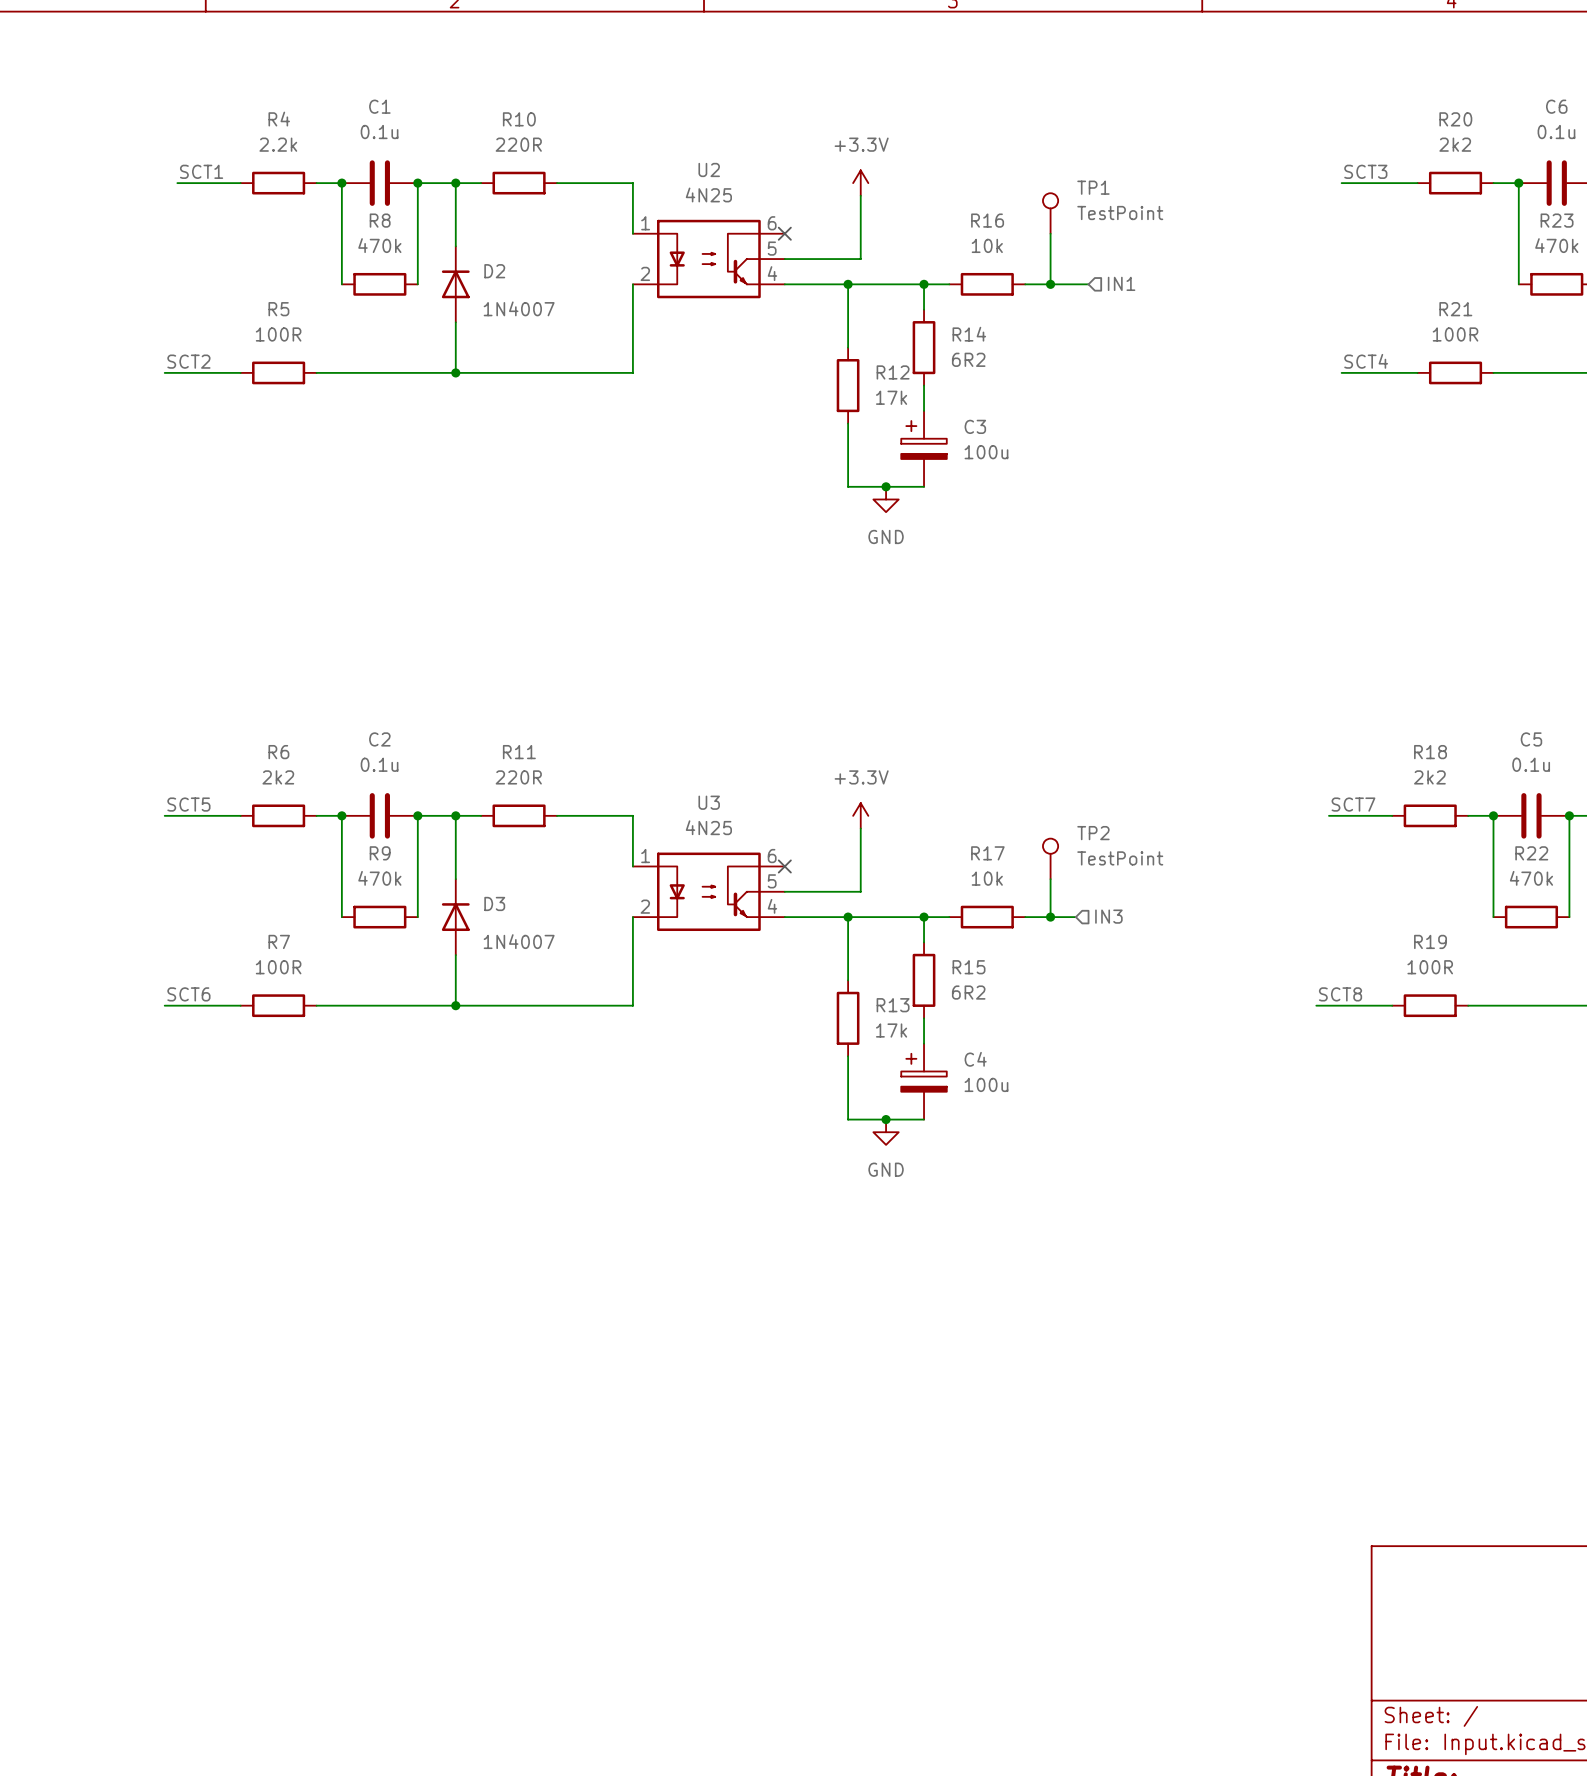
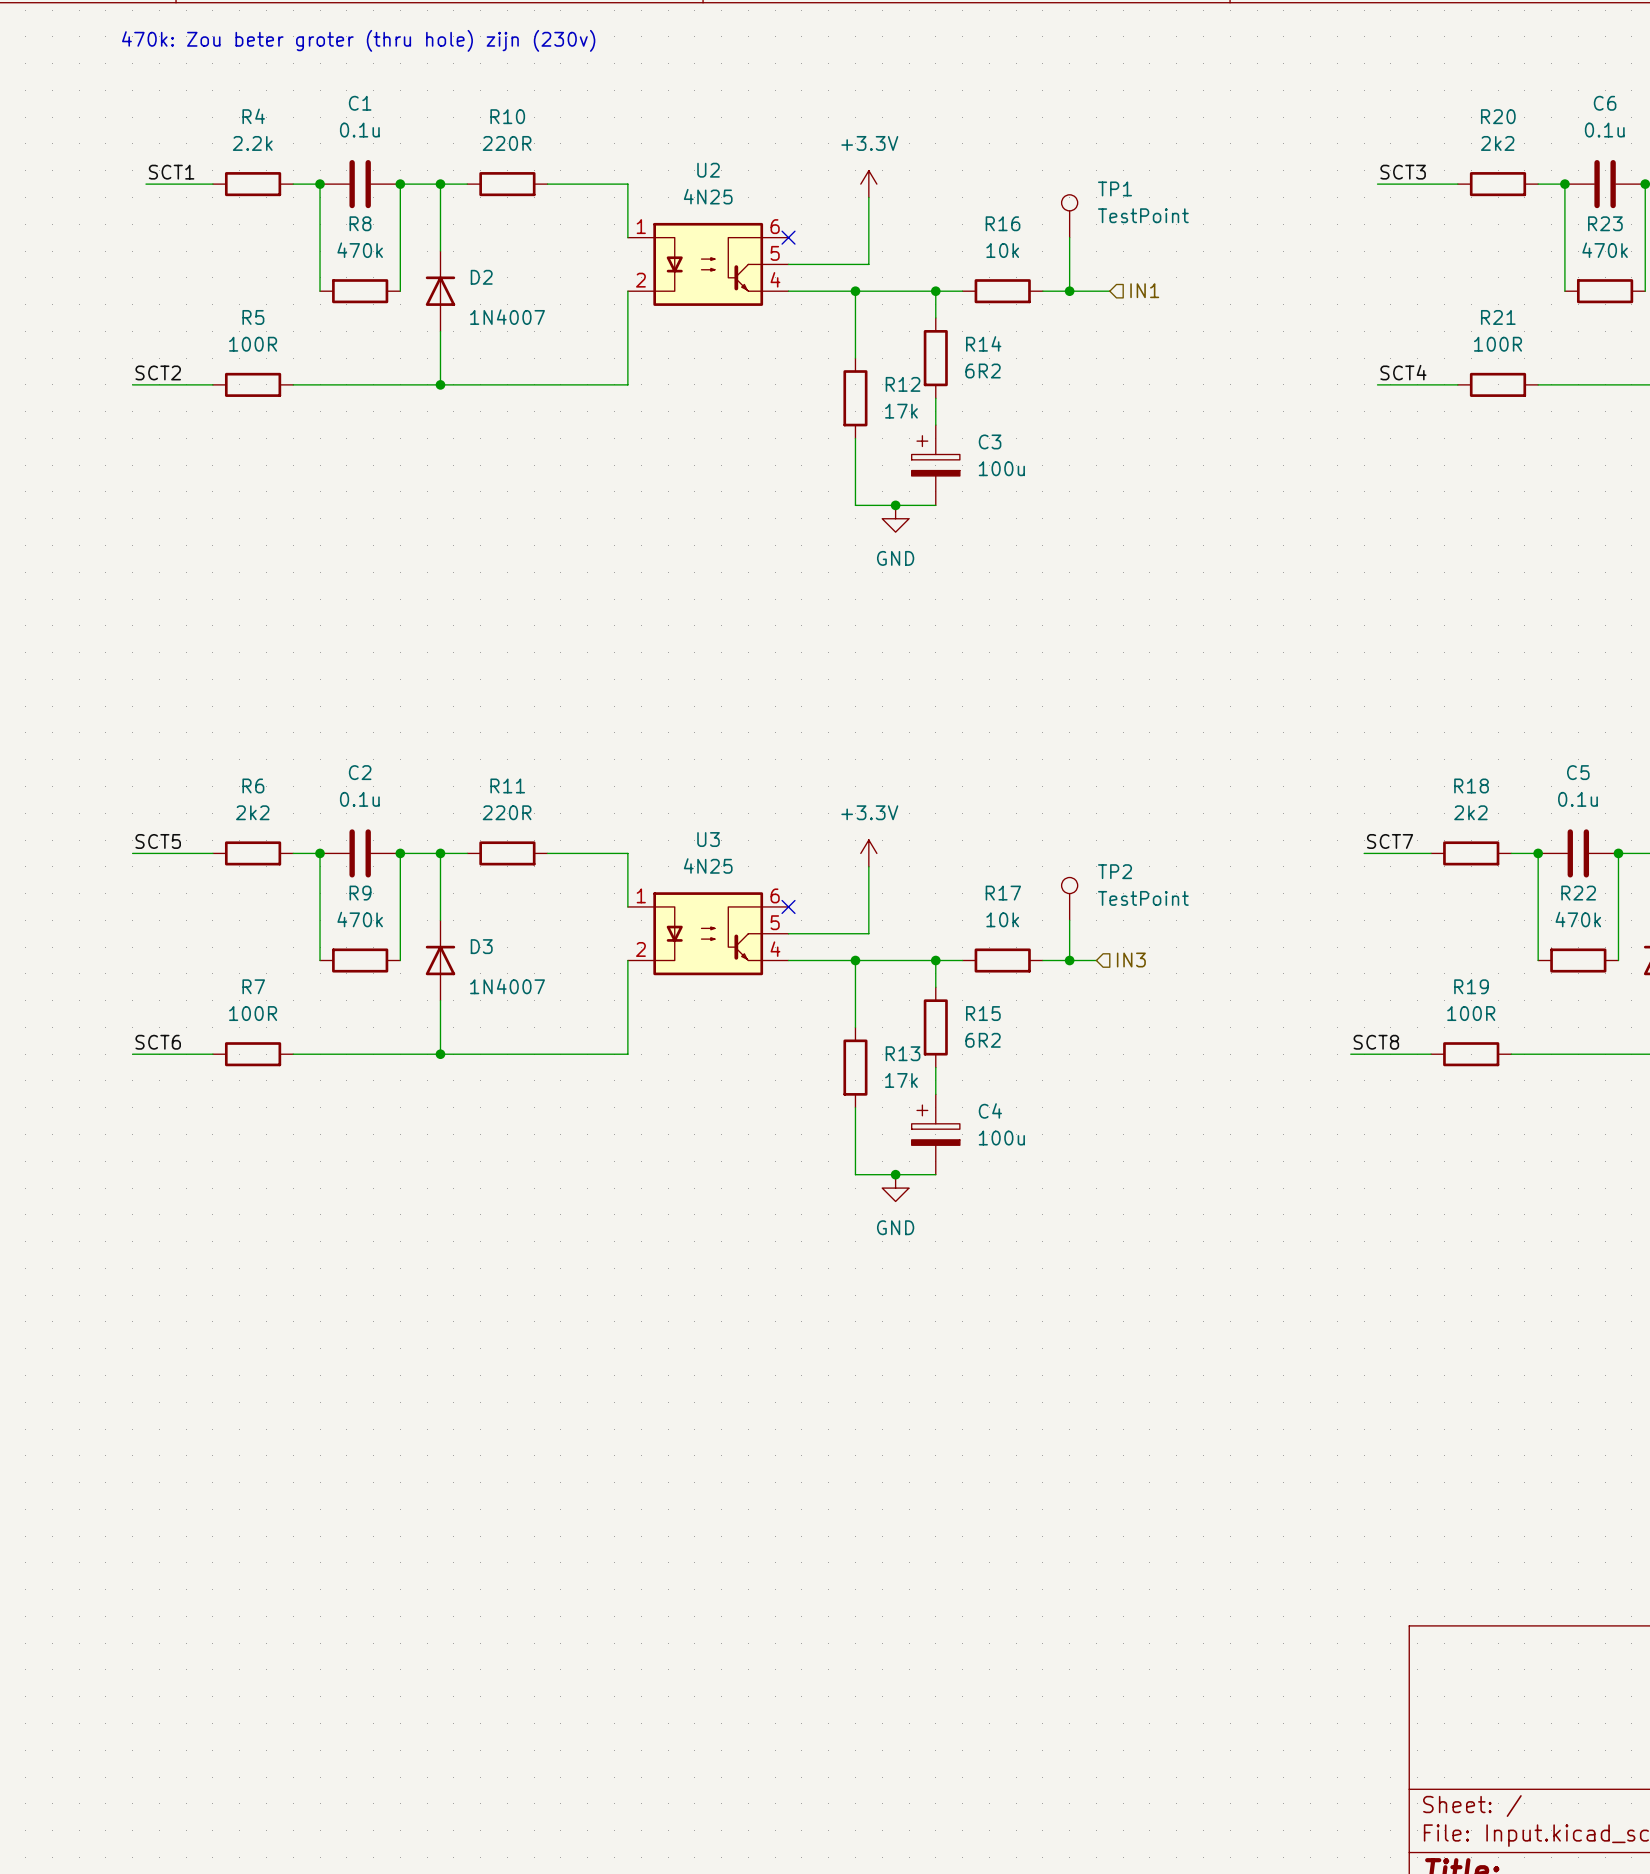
text: none -> 470k: Zou beter groter (thru hole) zijn (230v) (358, 40)

